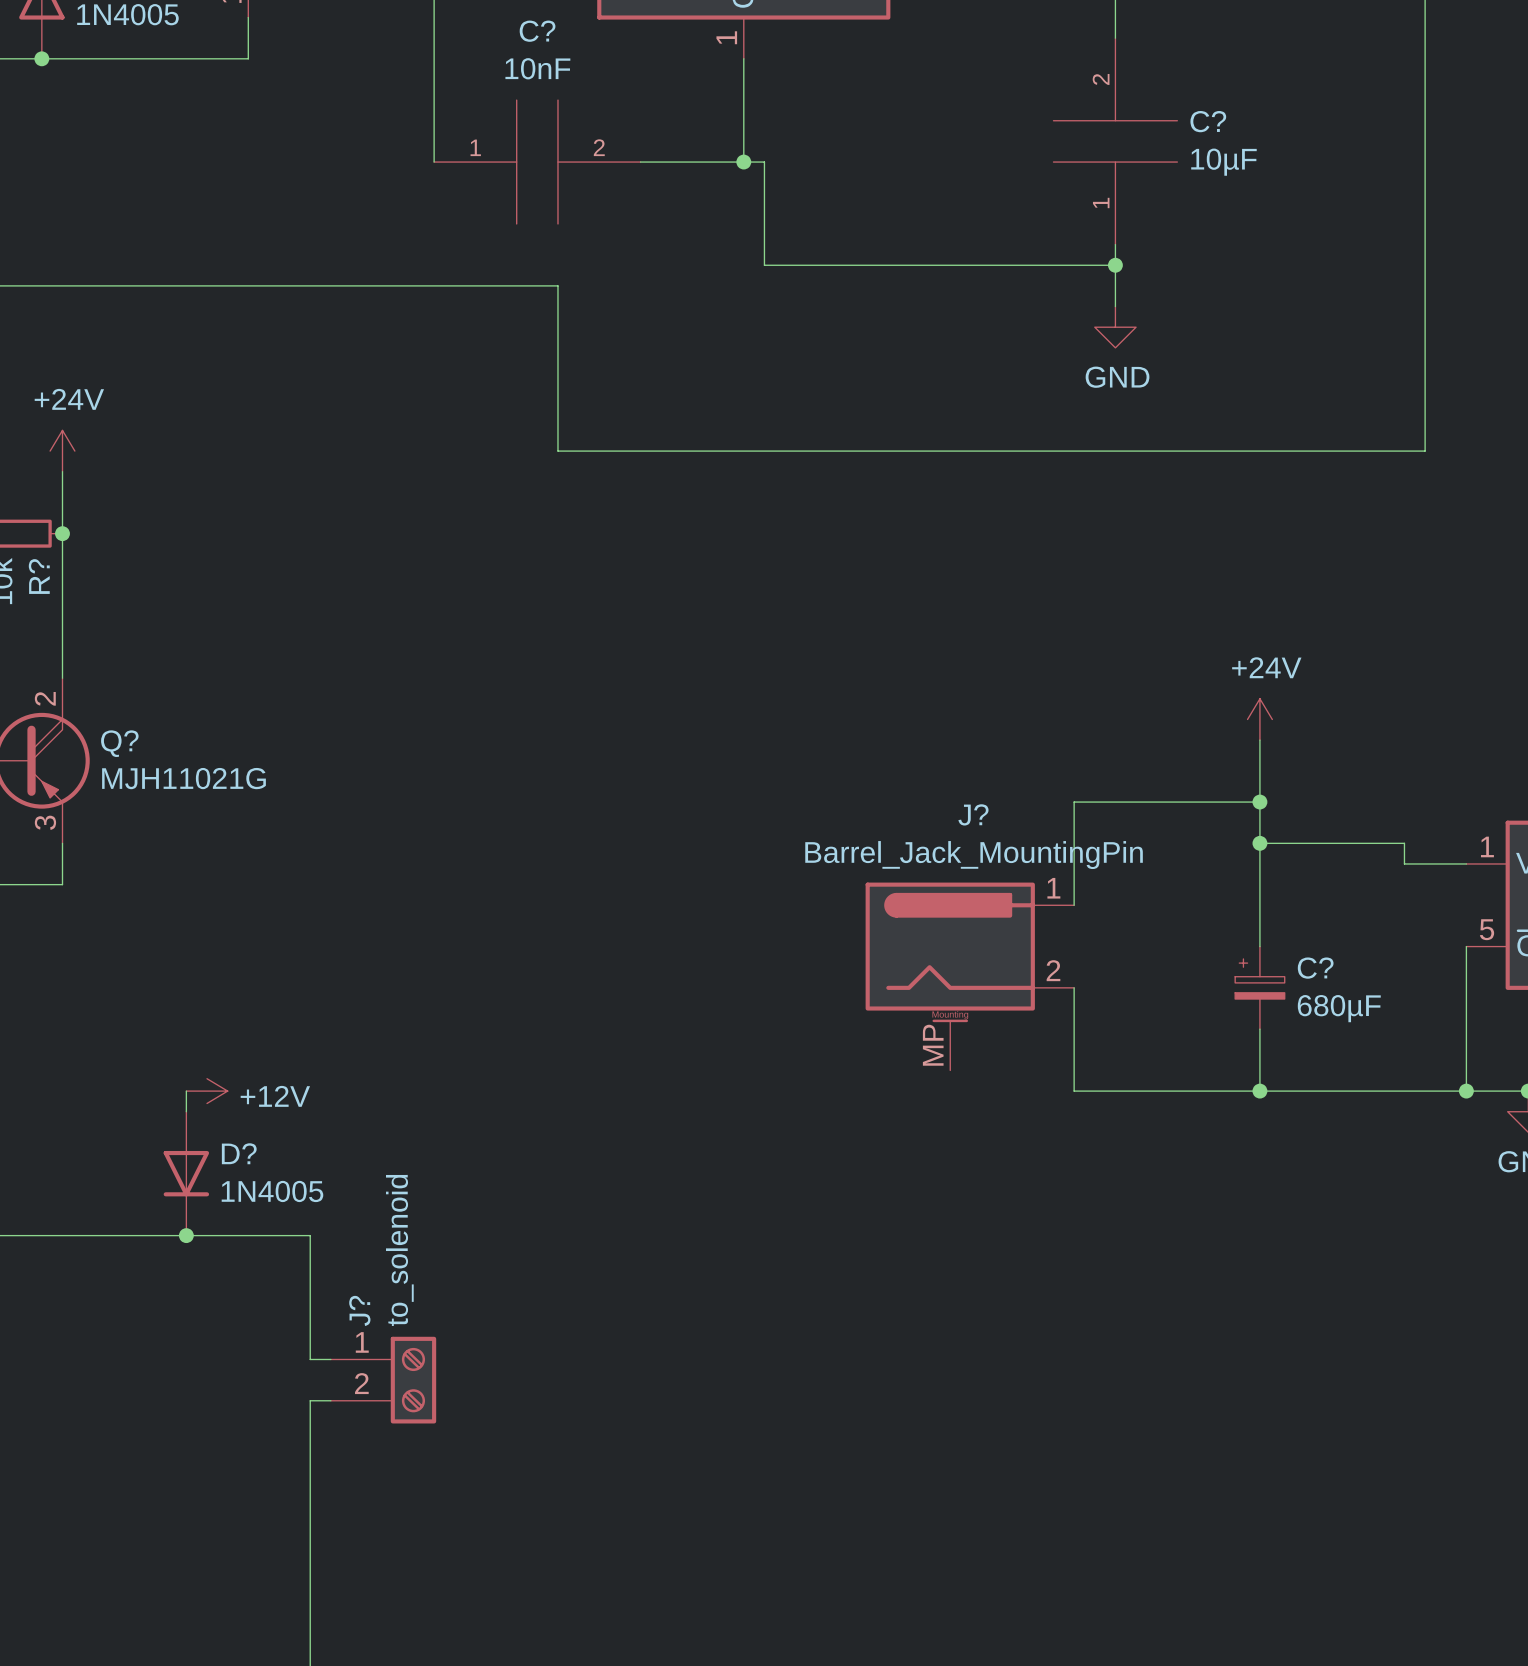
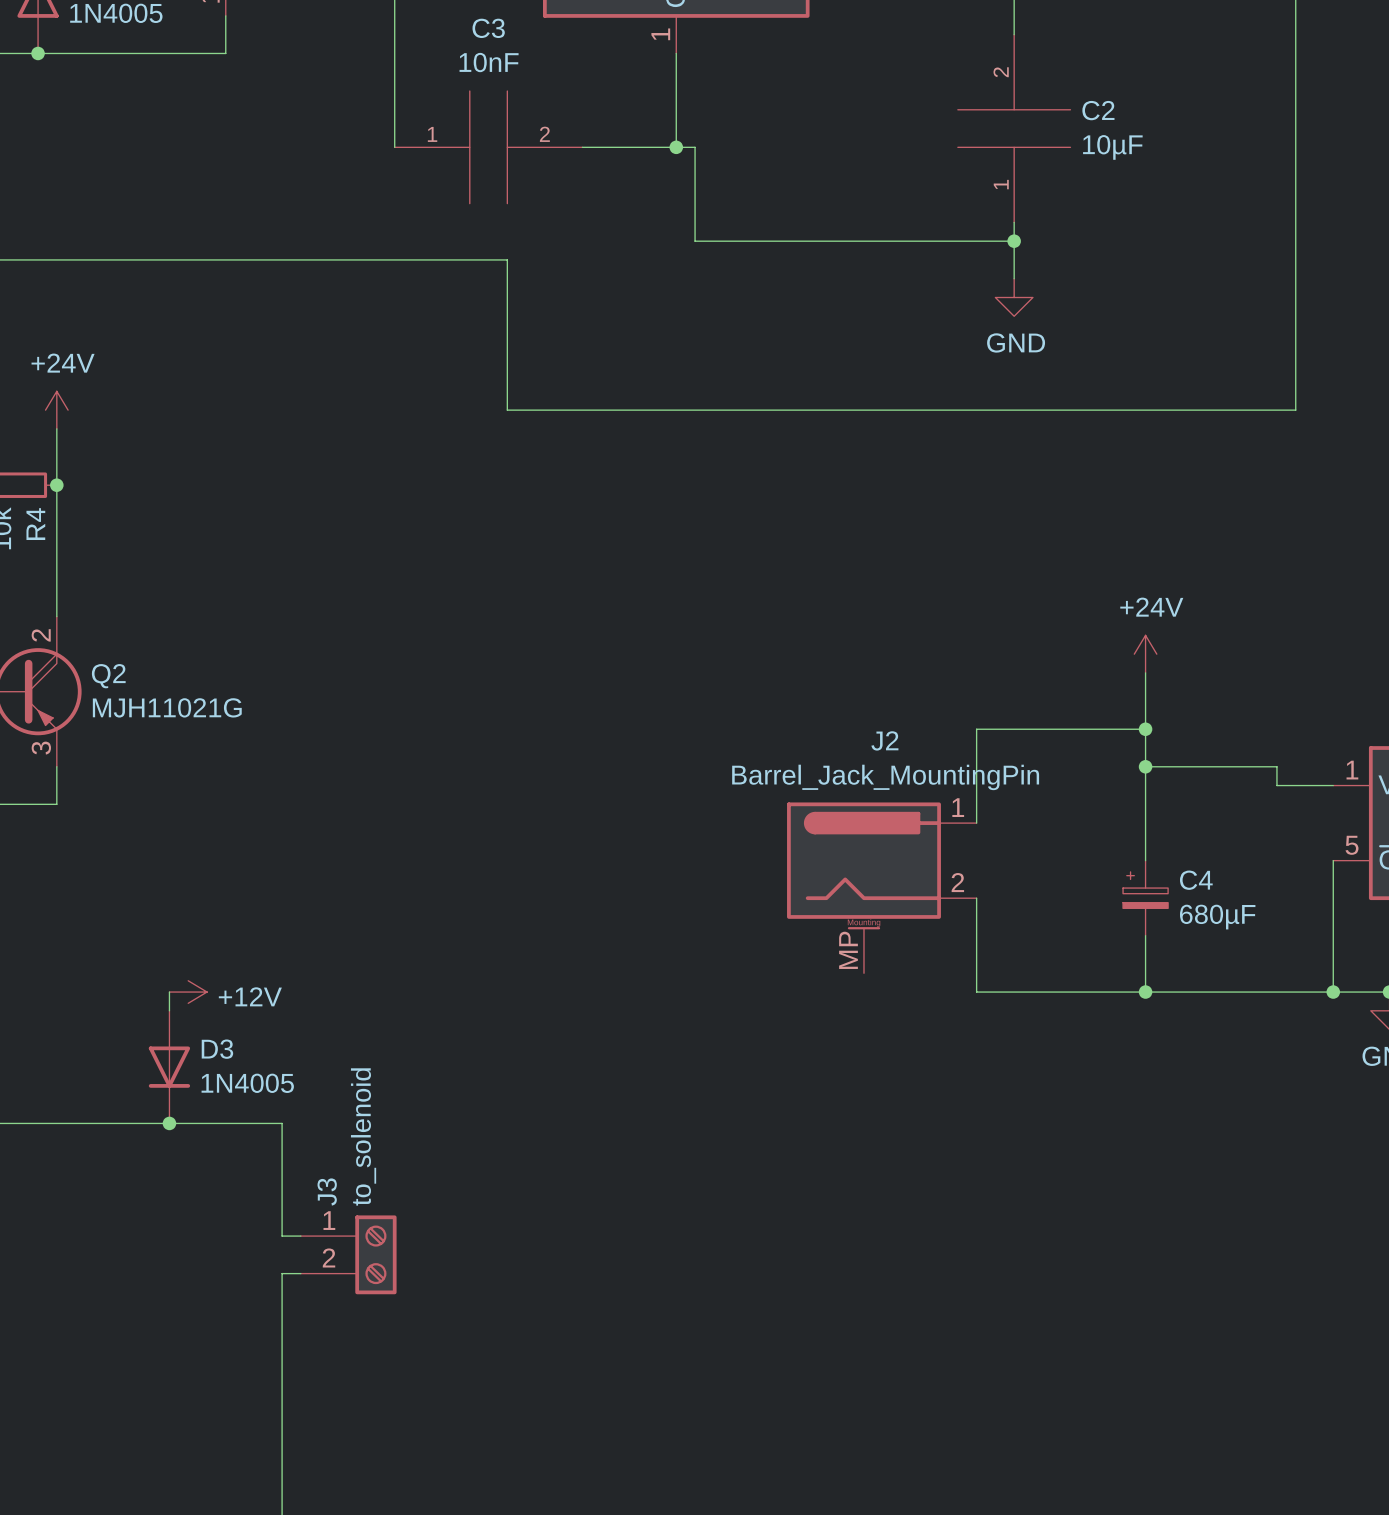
C? name: C? (537, 31) -> C3 (488, 28)
C? name: C? (1208, 121) -> C2 (1098, 110)
R? name: R? (39, 576) -> R4 (35, 524)
Q? name: Q? (119, 743) -> Q2 (108, 676)
J? name: J? (973, 814) -> J2 (884, 740)
C? name: C? (1315, 968) -> C4 (1196, 880)
D? name: D? (239, 1153) -> D3 (217, 1049)
J? name: J? (359, 1310) -> J3 (327, 1192)

